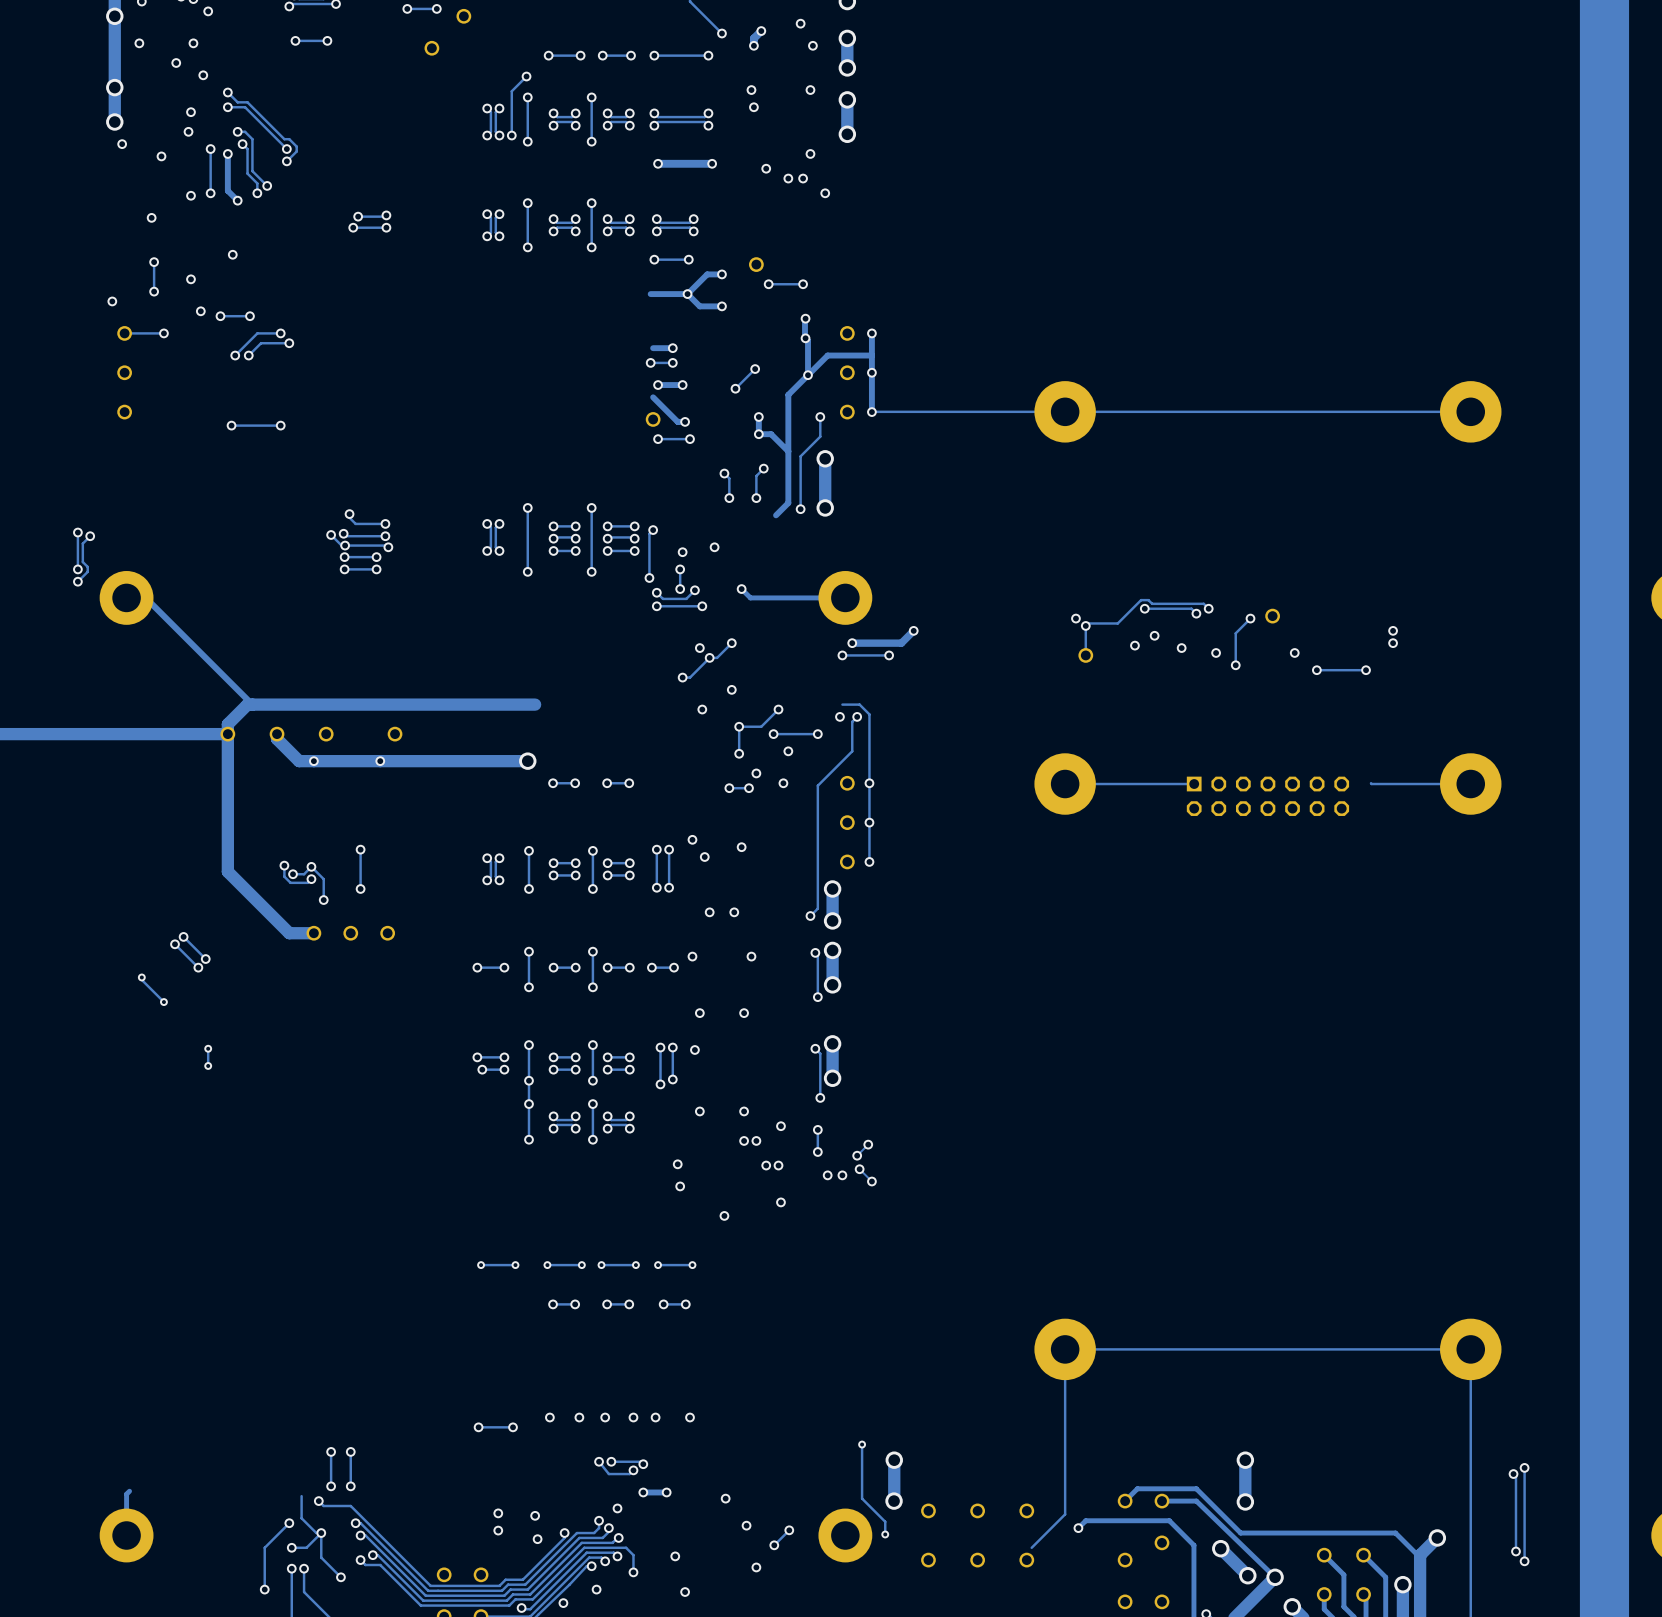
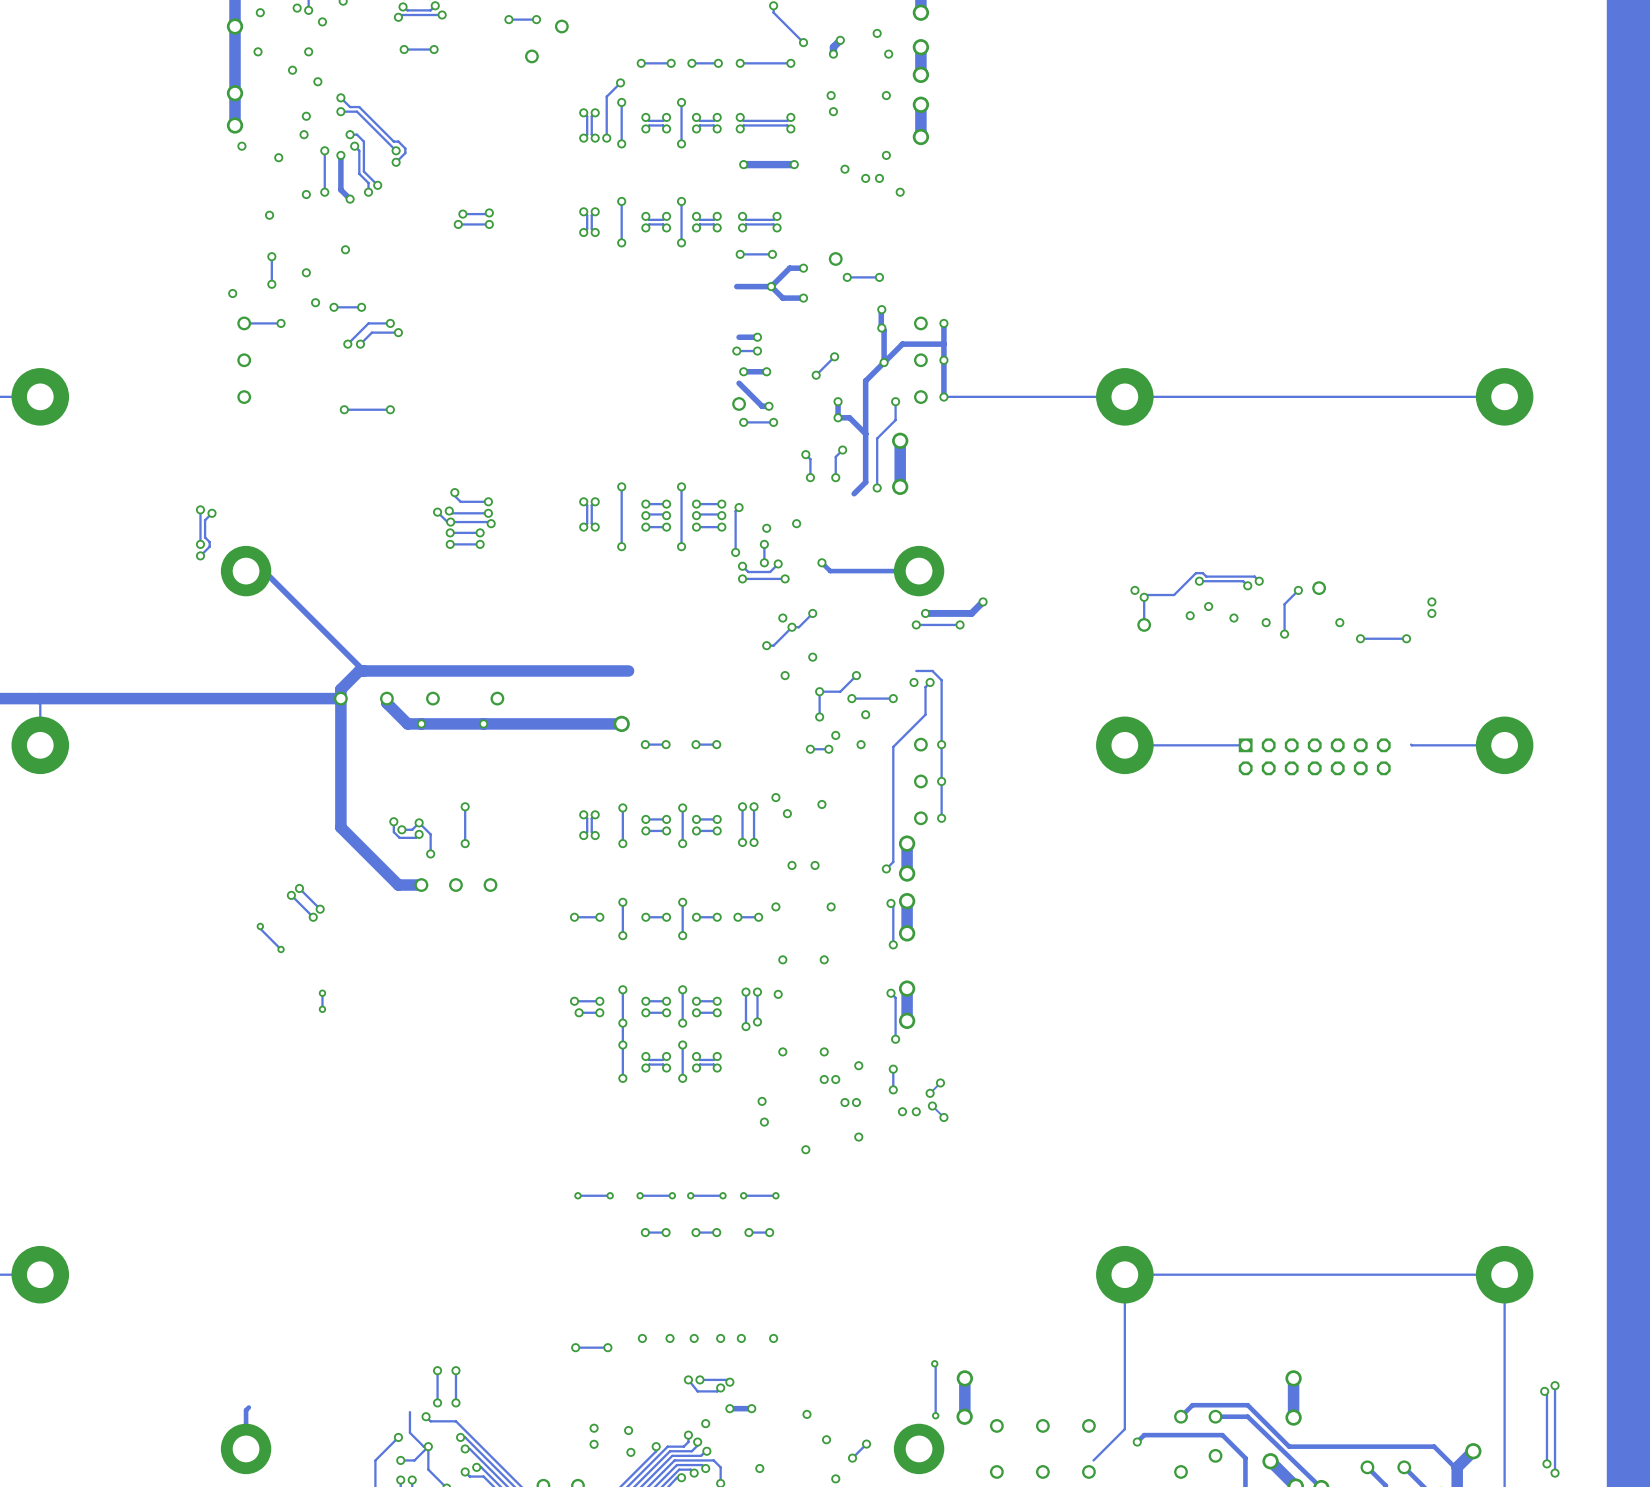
track: (862, 1444) (862, 1498) (885, 1521) (885, 1534) -> (934, 1363) (935, 1415)
via position: (885, 1534) -> (935, 1415)

